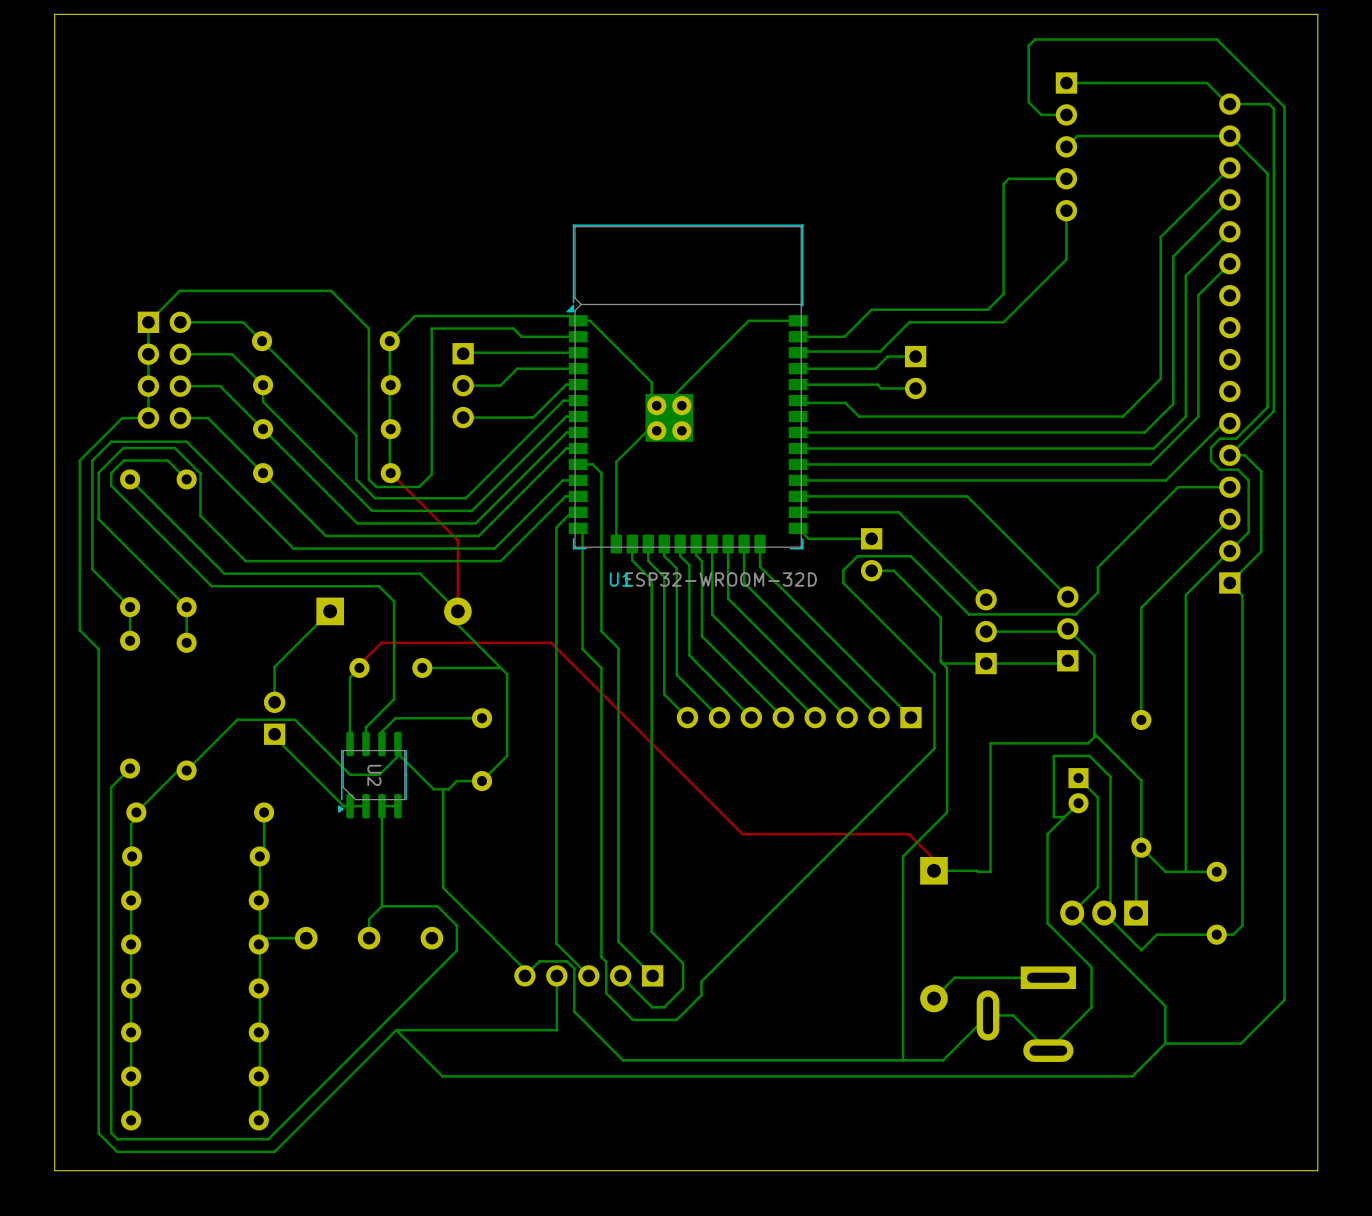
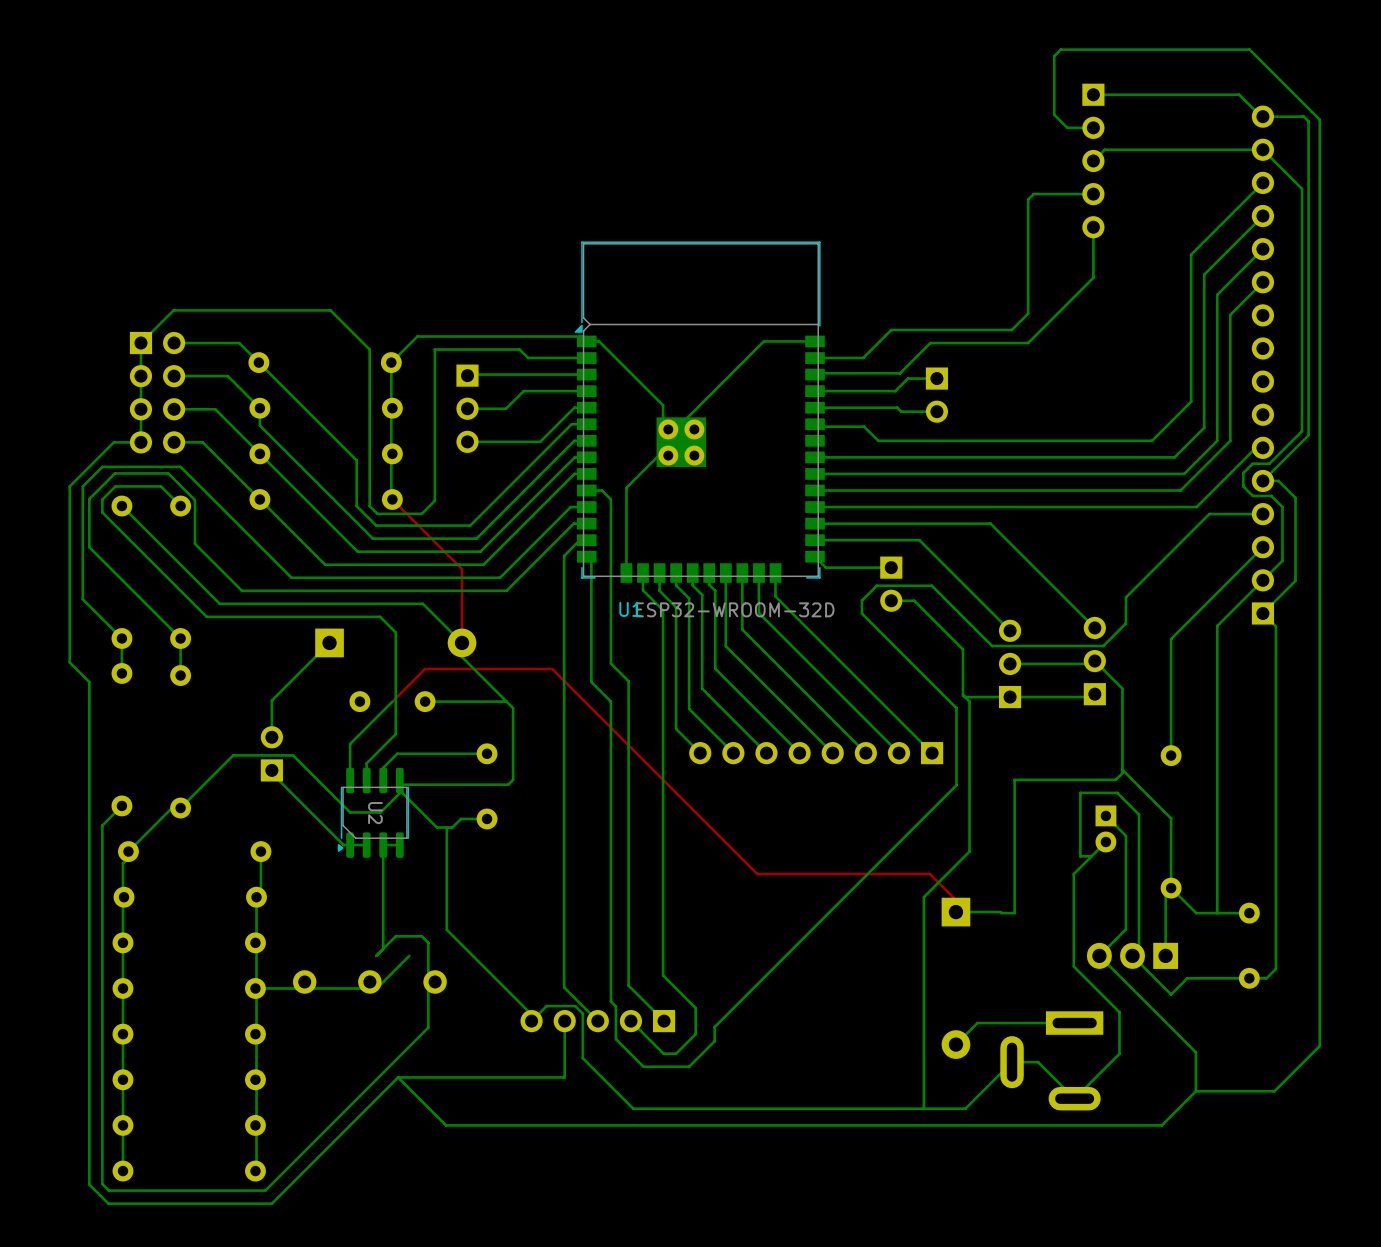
board edge: (1317, 14) (54, 14) (54, 1170) (1317, 1170) (1317, 14) -> none
top track: (551, 642) (381, 642) (359, 664) (359, 667) -> (558, 675) (552, 669) (425, 669) (392, 701)
bottom track: (359, 667) (350, 677) (350, 708) -> (392, 701) (350, 744)
bottom track: (507, 743) (507, 755) (482, 781) -> (513, 779) (508, 784) (403, 784)
bottom track: (381, 906) (437, 906) (456, 925) (456, 950) (425, 982) -> (383, 948) (395, 936) (421, 936) (428, 942) (428, 1027)
bottom track: (375, 913) (369, 919) (369, 938) -> none
bottom track: (306, 938) (265, 938) (258, 944) -> (409, 955) (376, 988) (255, 988)

